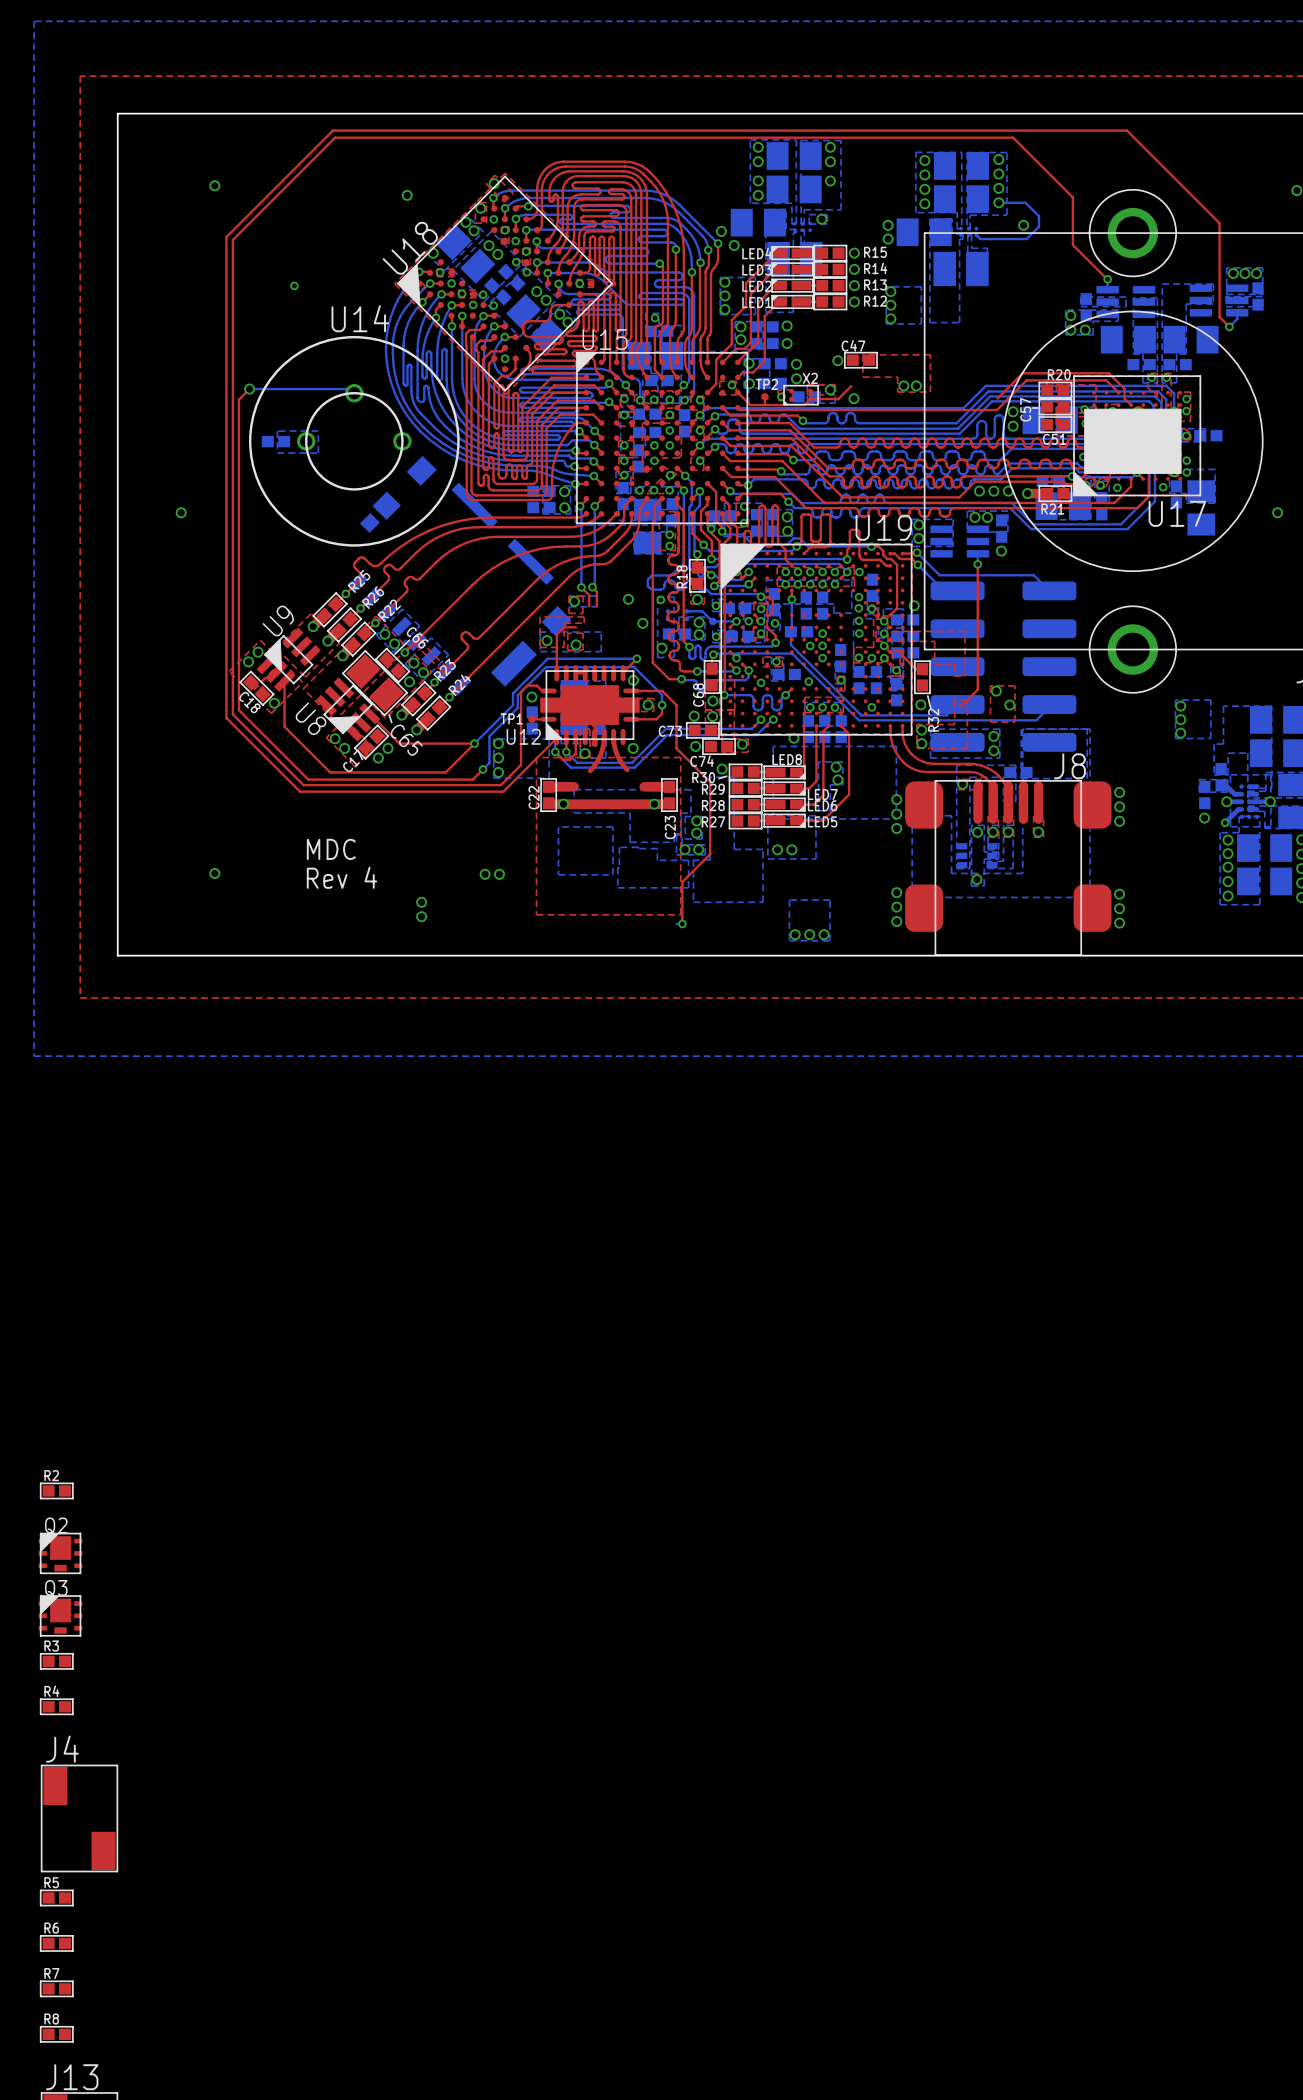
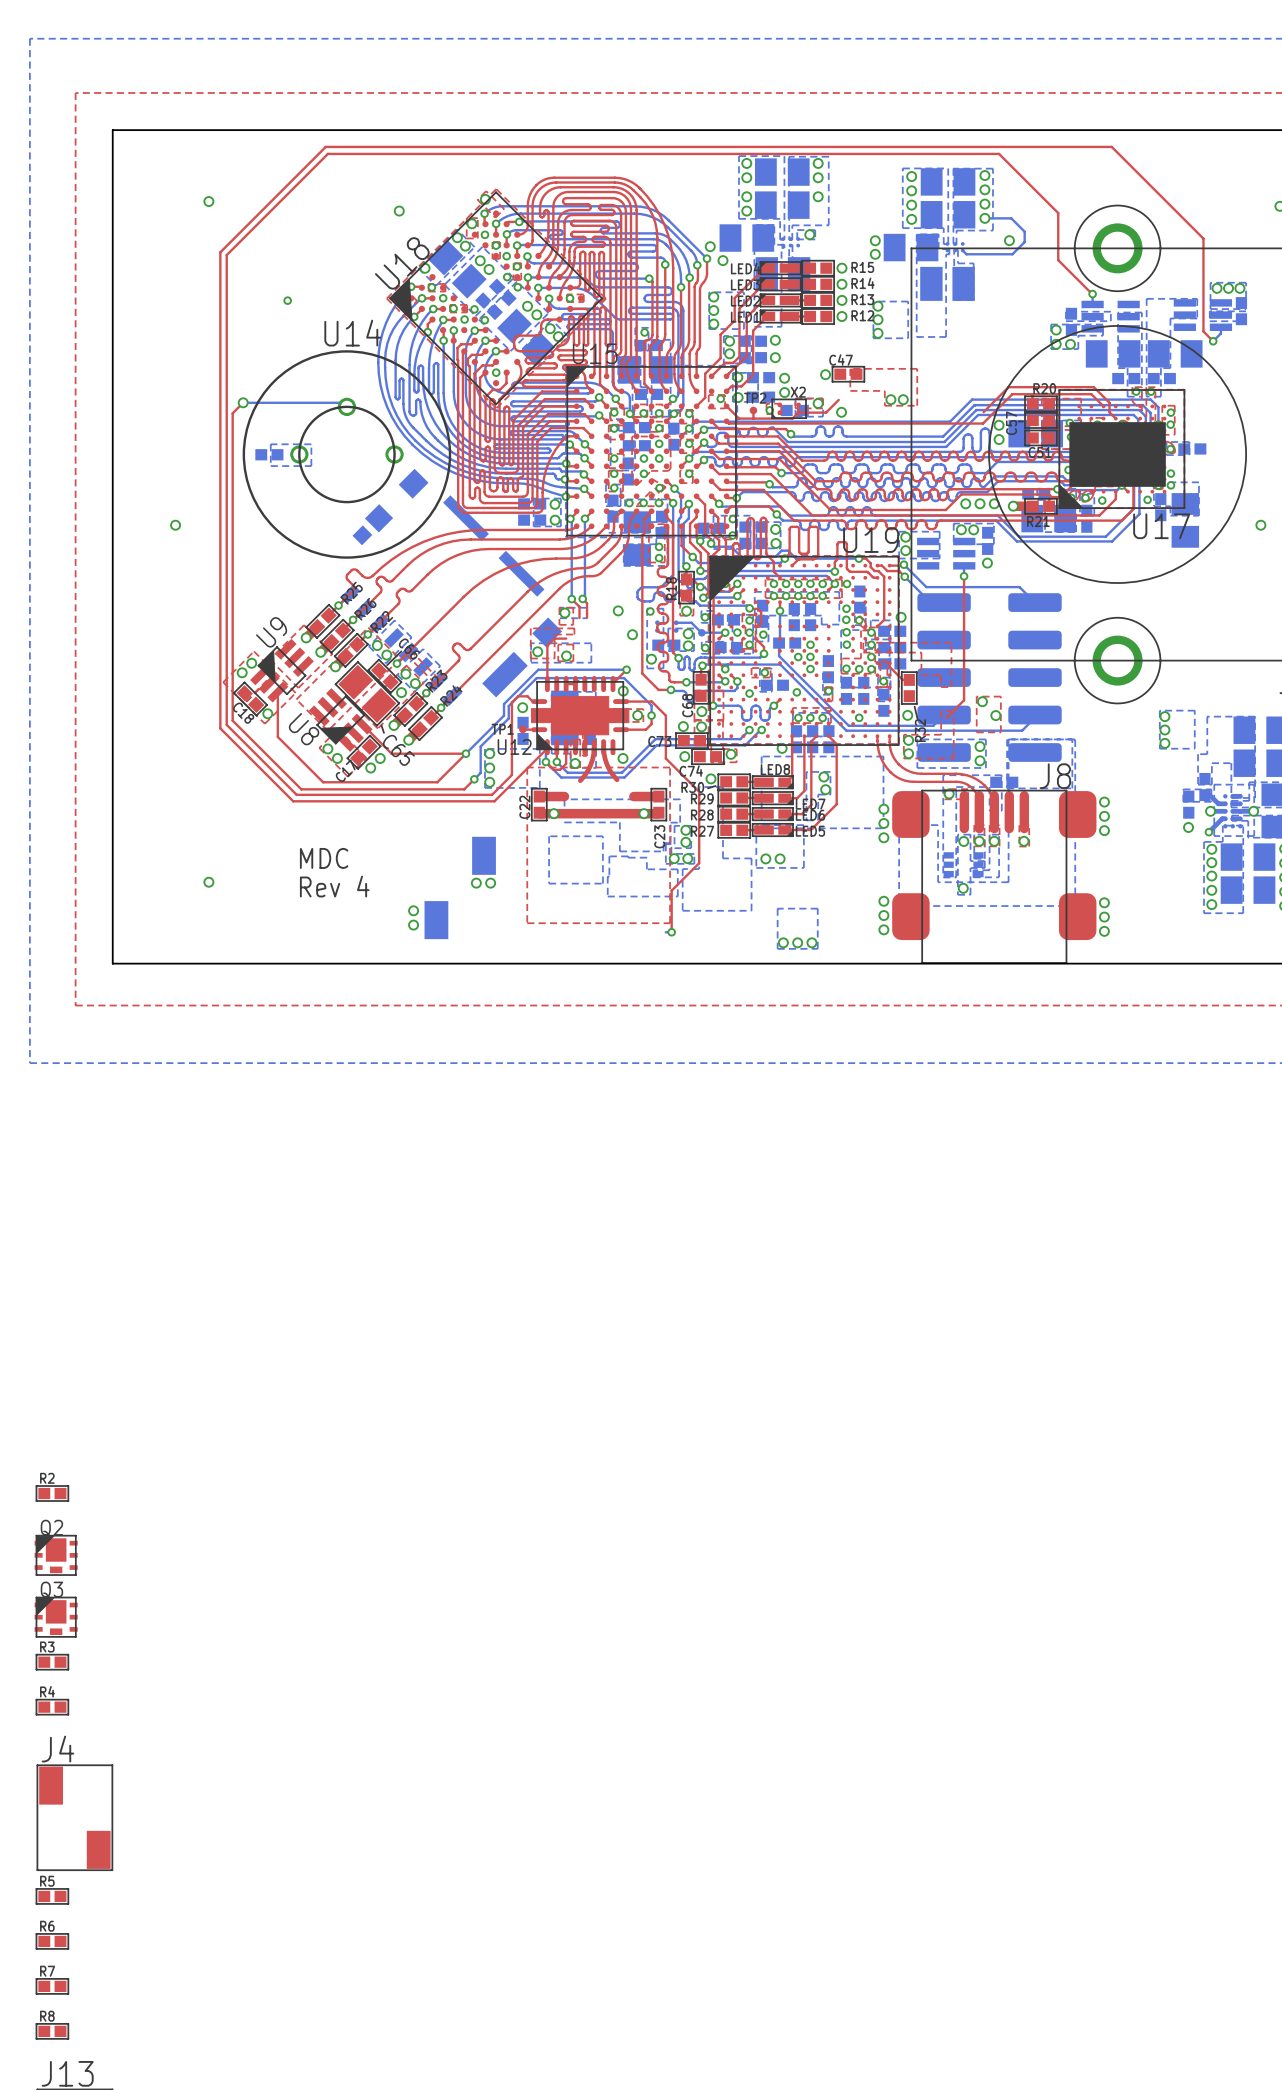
part: none -> (460, 887)

